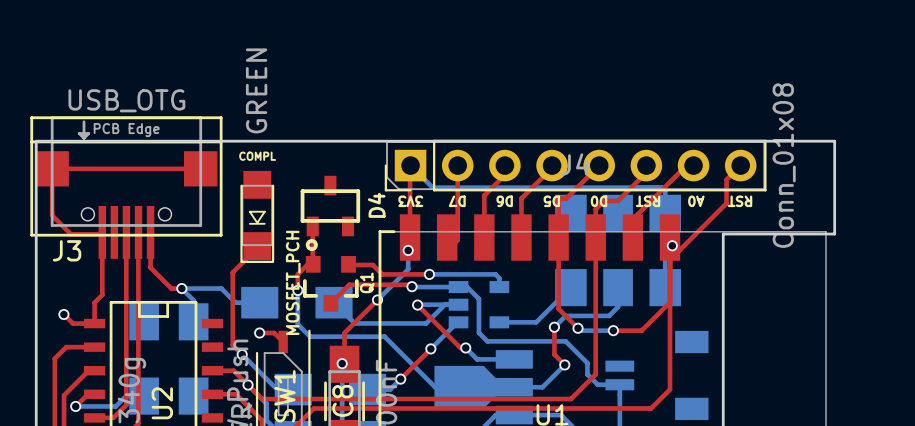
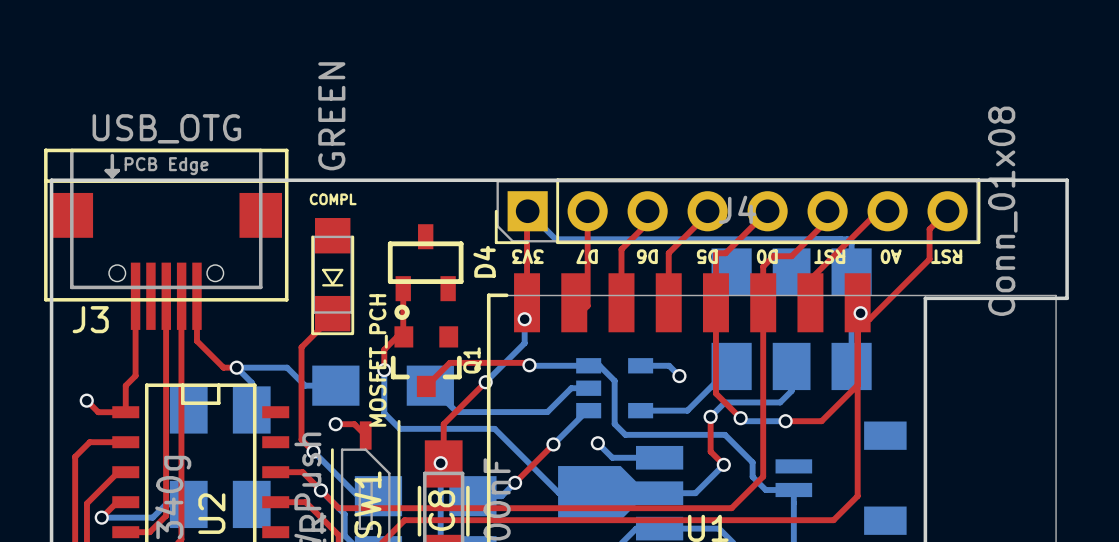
top track: (200, 168) (52, 168) (52, 215) (70, 234) (100, 234) (102, 232) -> none
top track: (348, 264) (372, 264) (382, 274) (429, 274) -> none
bottom track: (429, 274) (495, 274) (499, 278) (499, 287) -> (679, 376) (669, 365) (640, 365)
via: (429, 274) -> none
via: none -> (679, 376)
bottom track: (444, 304) (417, 305) -> none
top track: (417, 305) (460, 347) (465, 347) -> none
via: (417, 305) -> none

